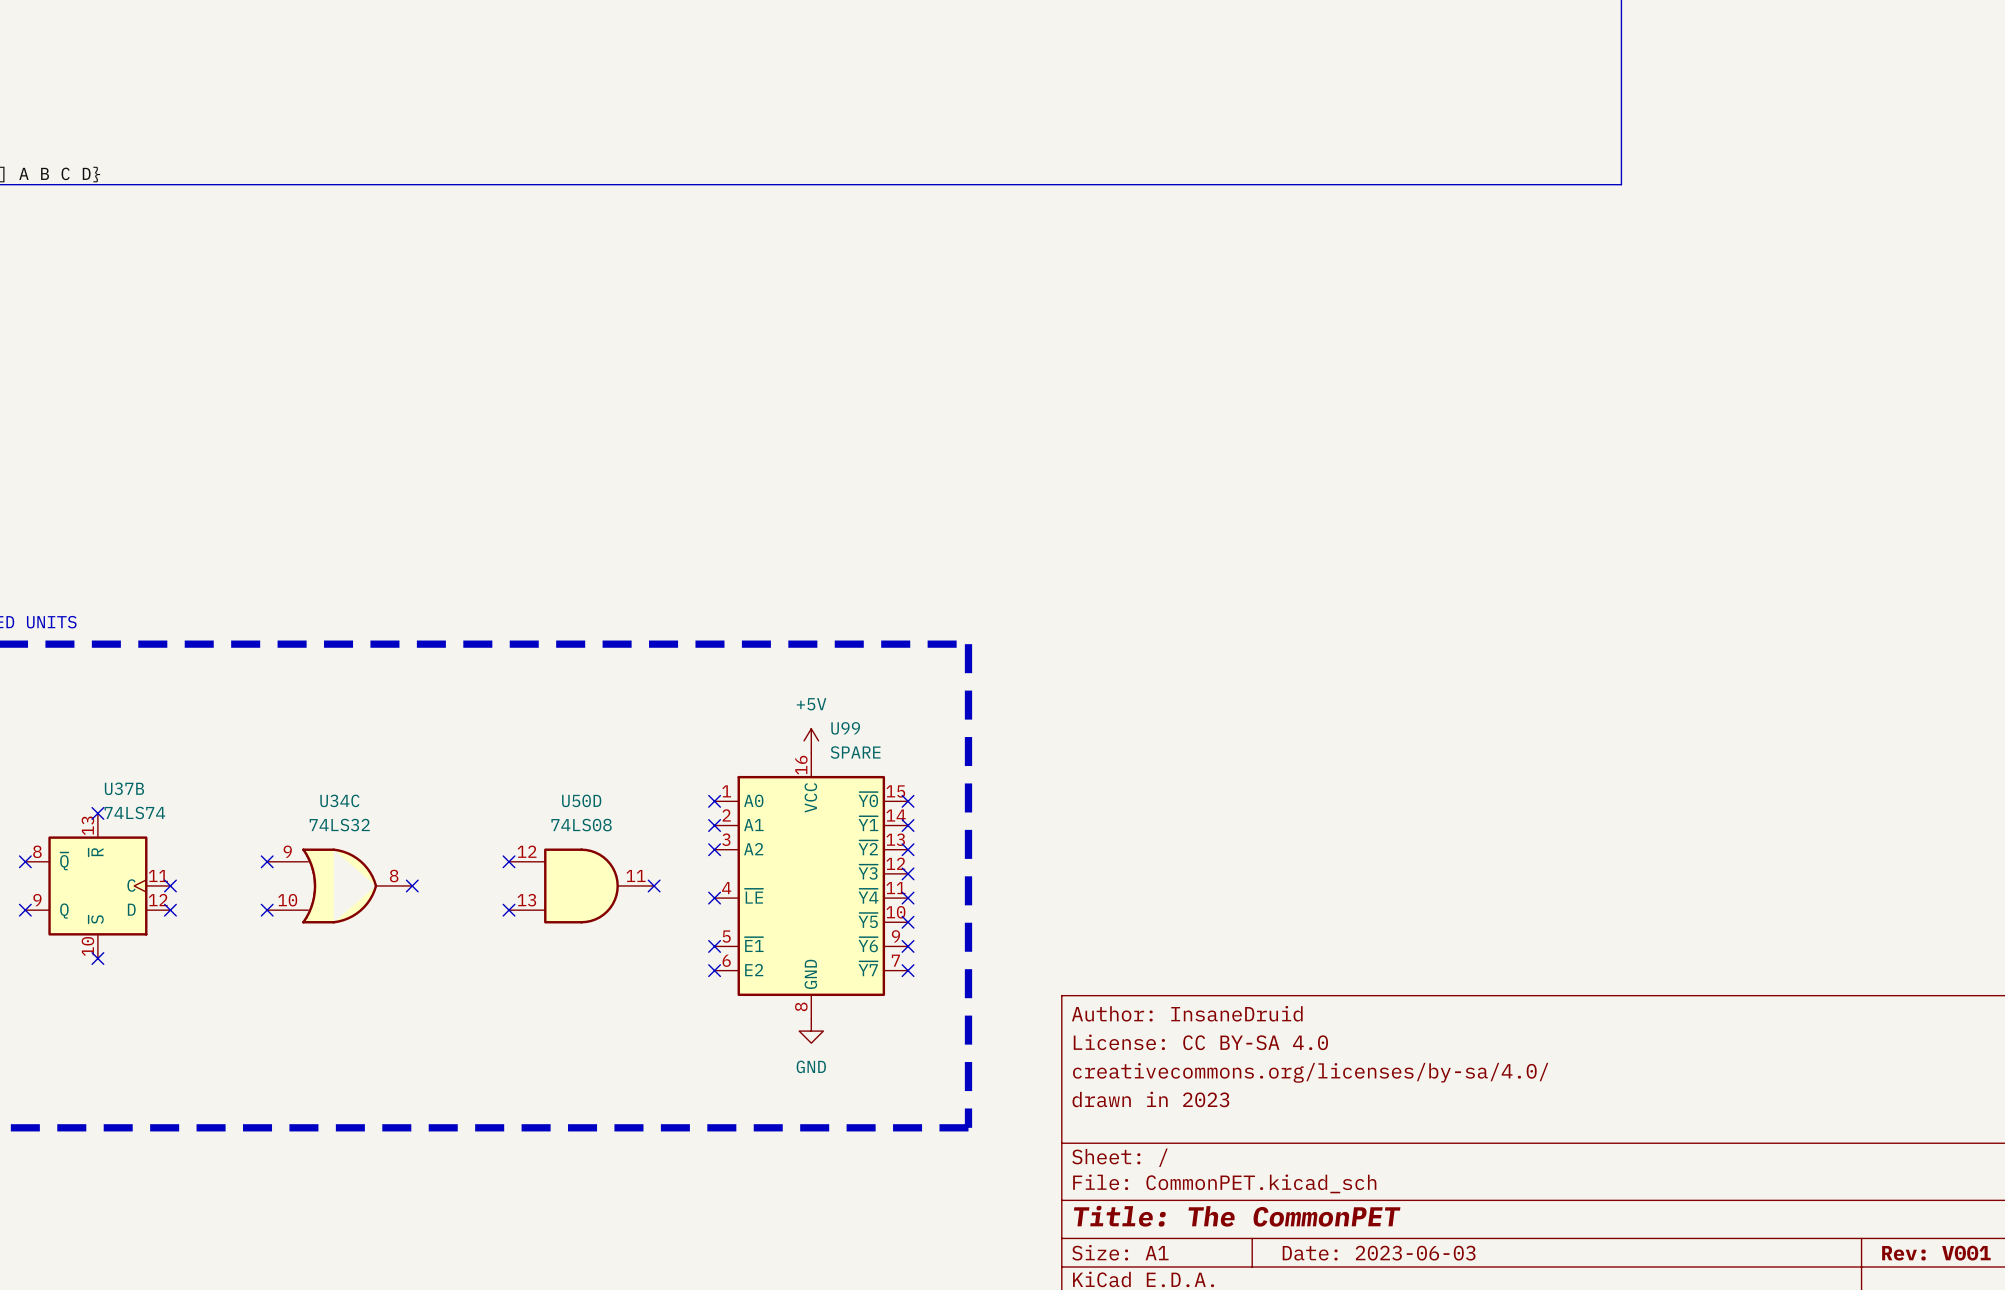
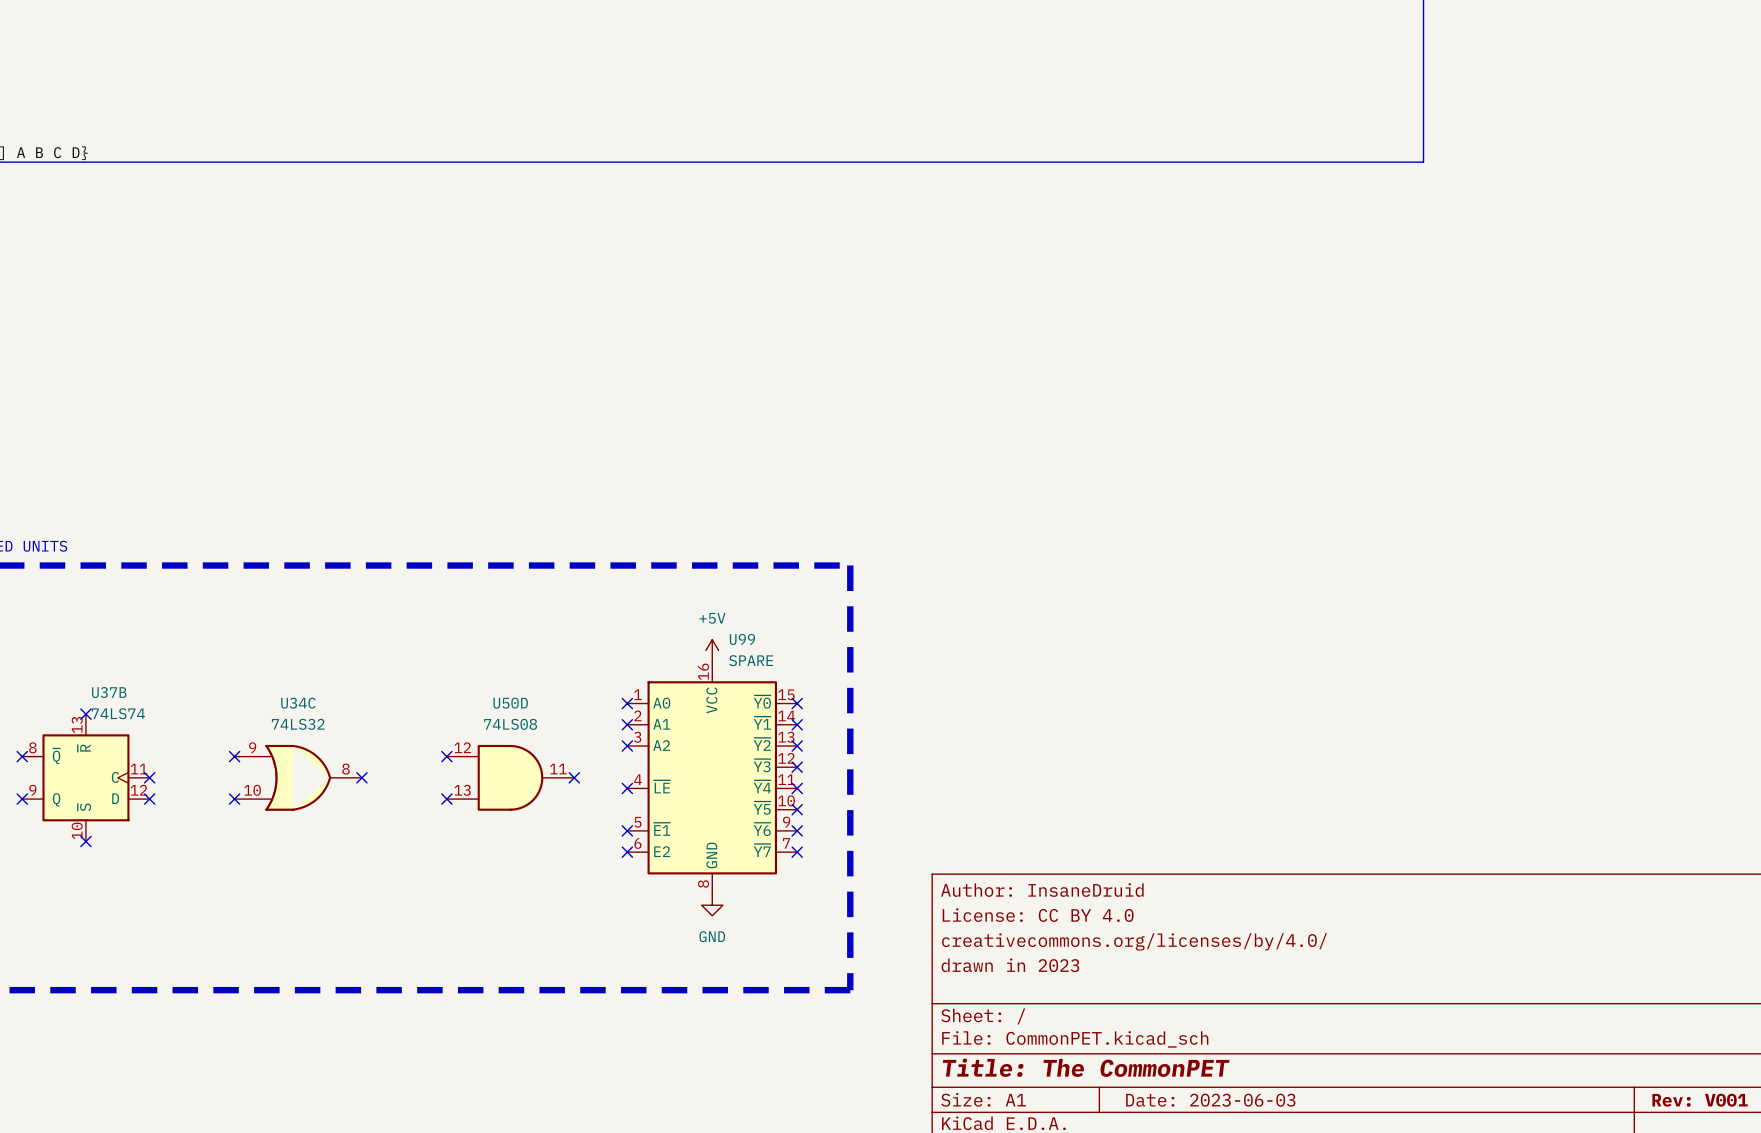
title block: License: CC BY-SA 4.0 (1200, 1042) -> License: CC BY 4.0 (1038, 915)
title block: creativecommons.org/licenses/by-sa/4.0/ (1310, 1072) -> creativecommons.org/licenses/by/4.0/ (1134, 941)

